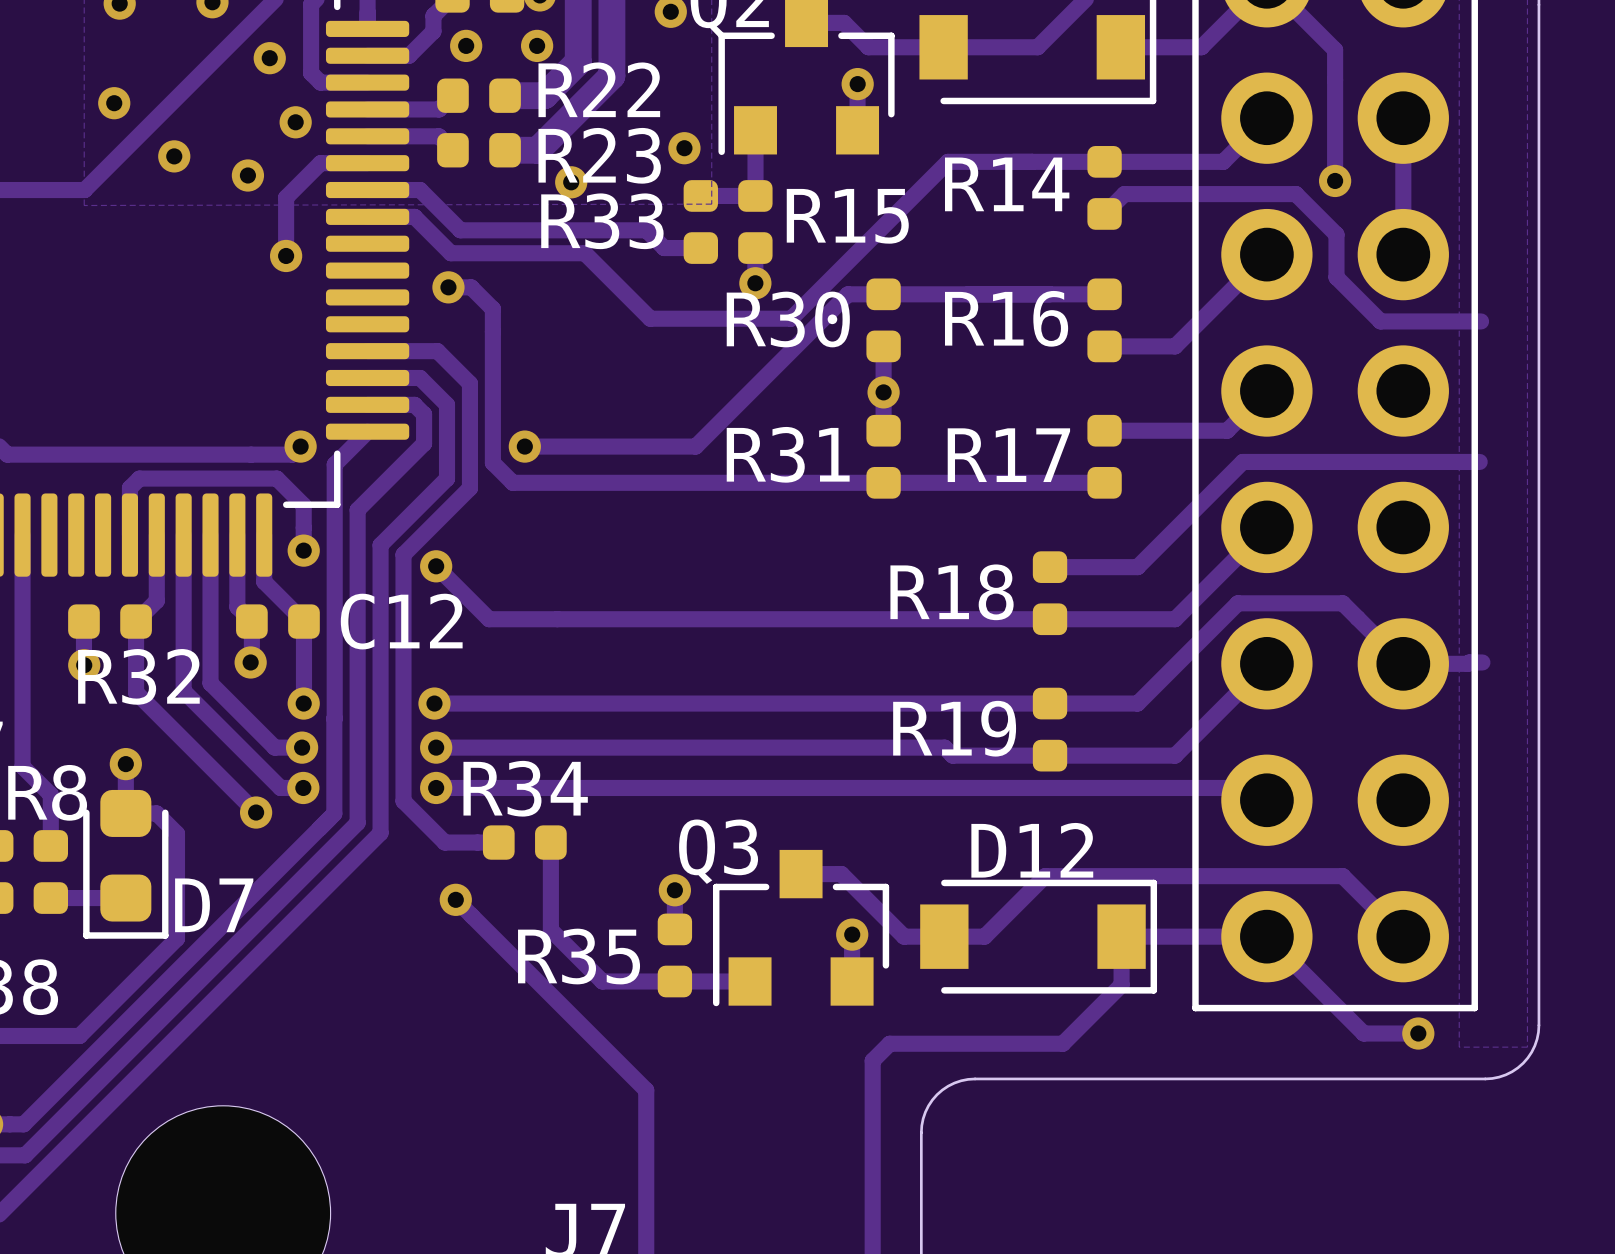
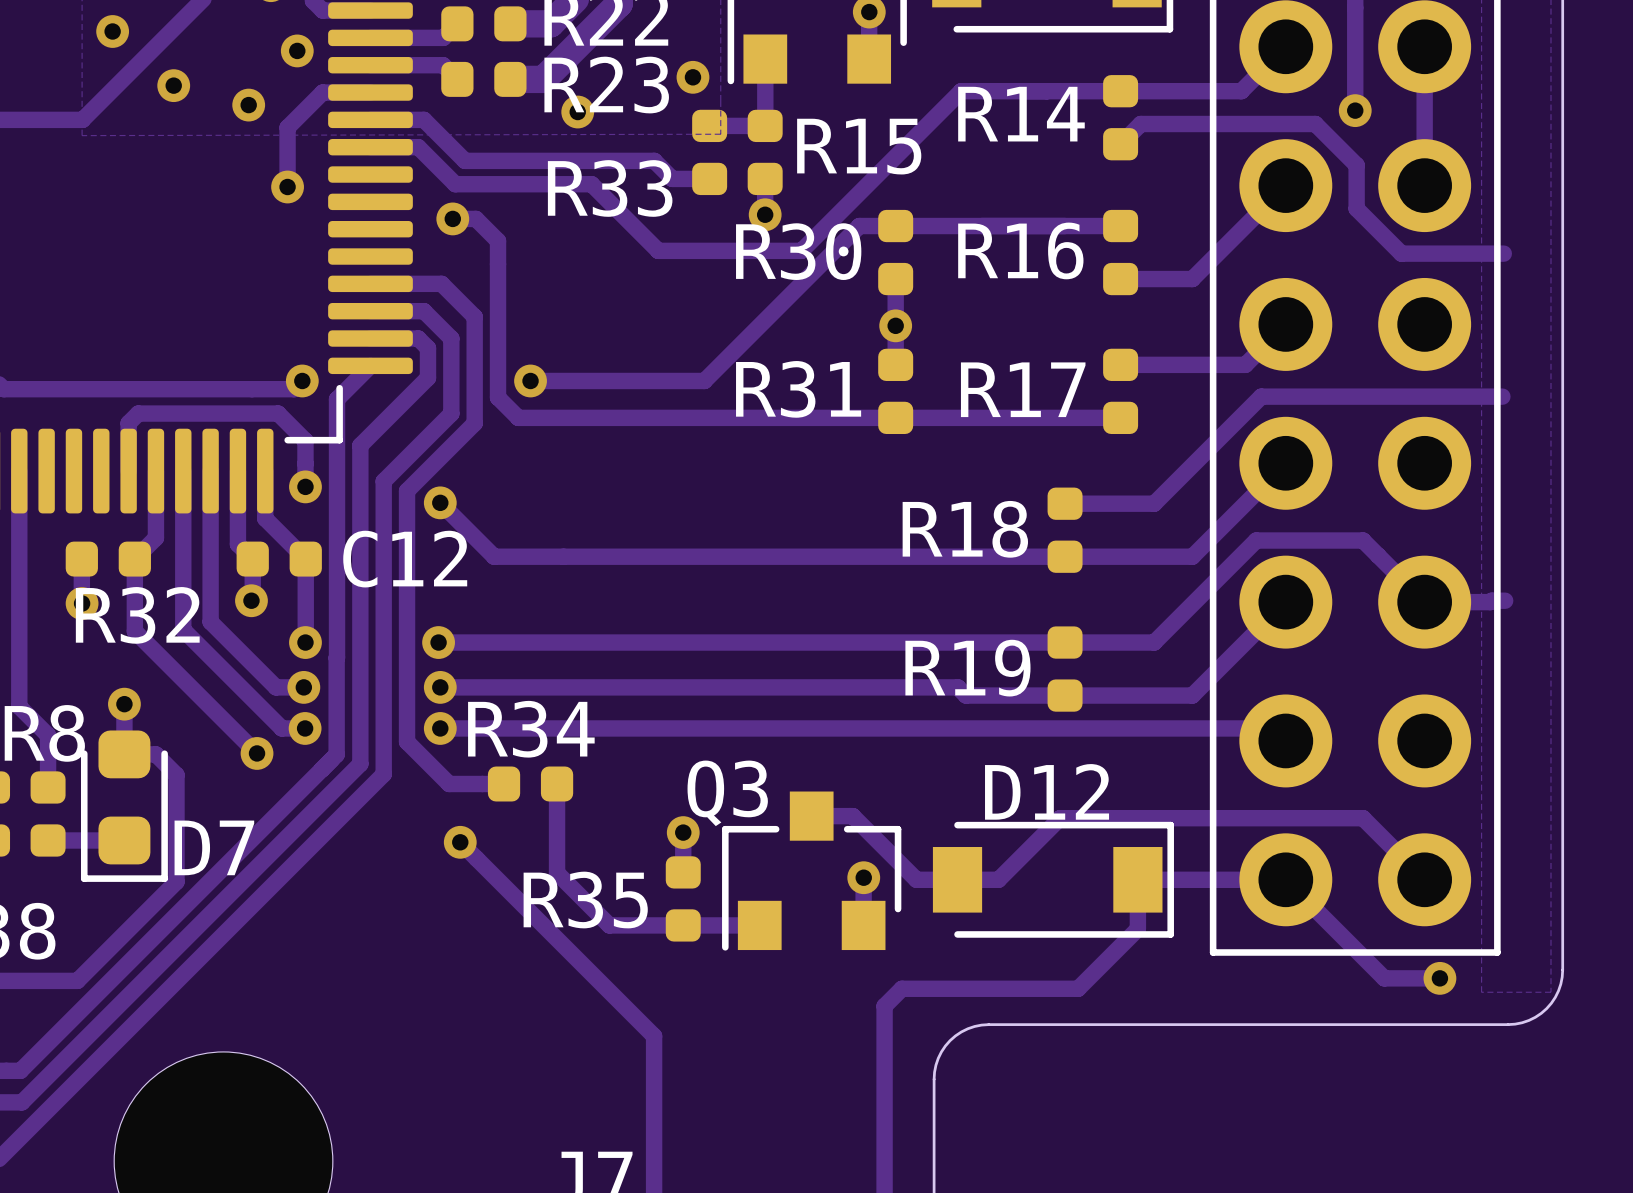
R33 name position: R33 (602, 221) -> R33 (610, 188)

